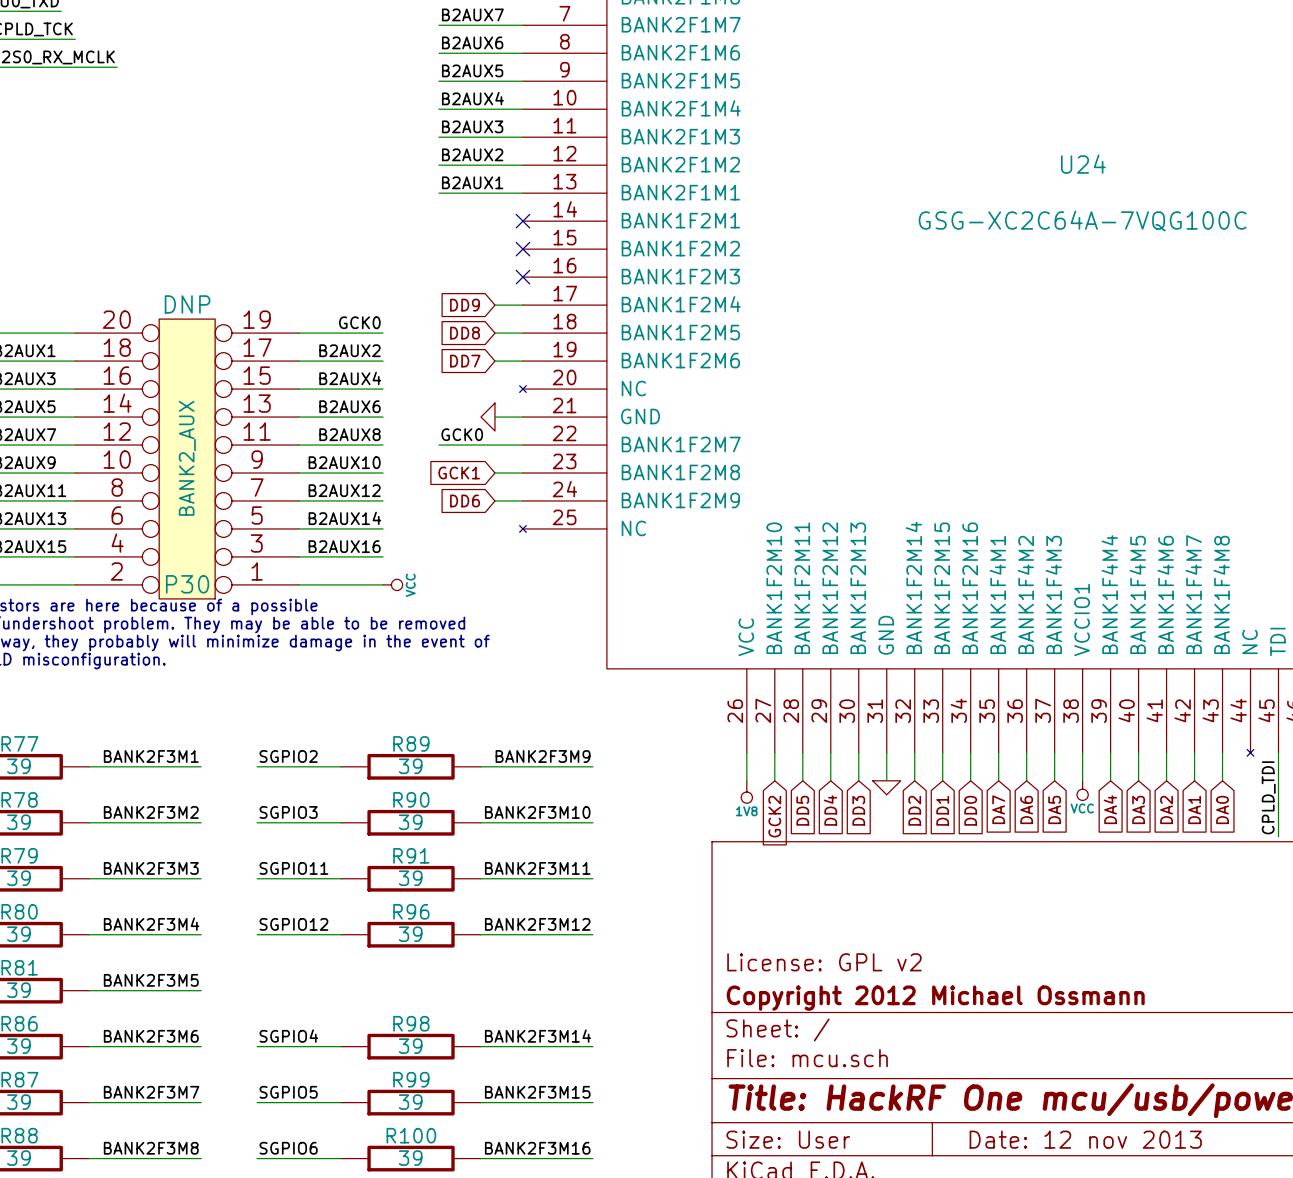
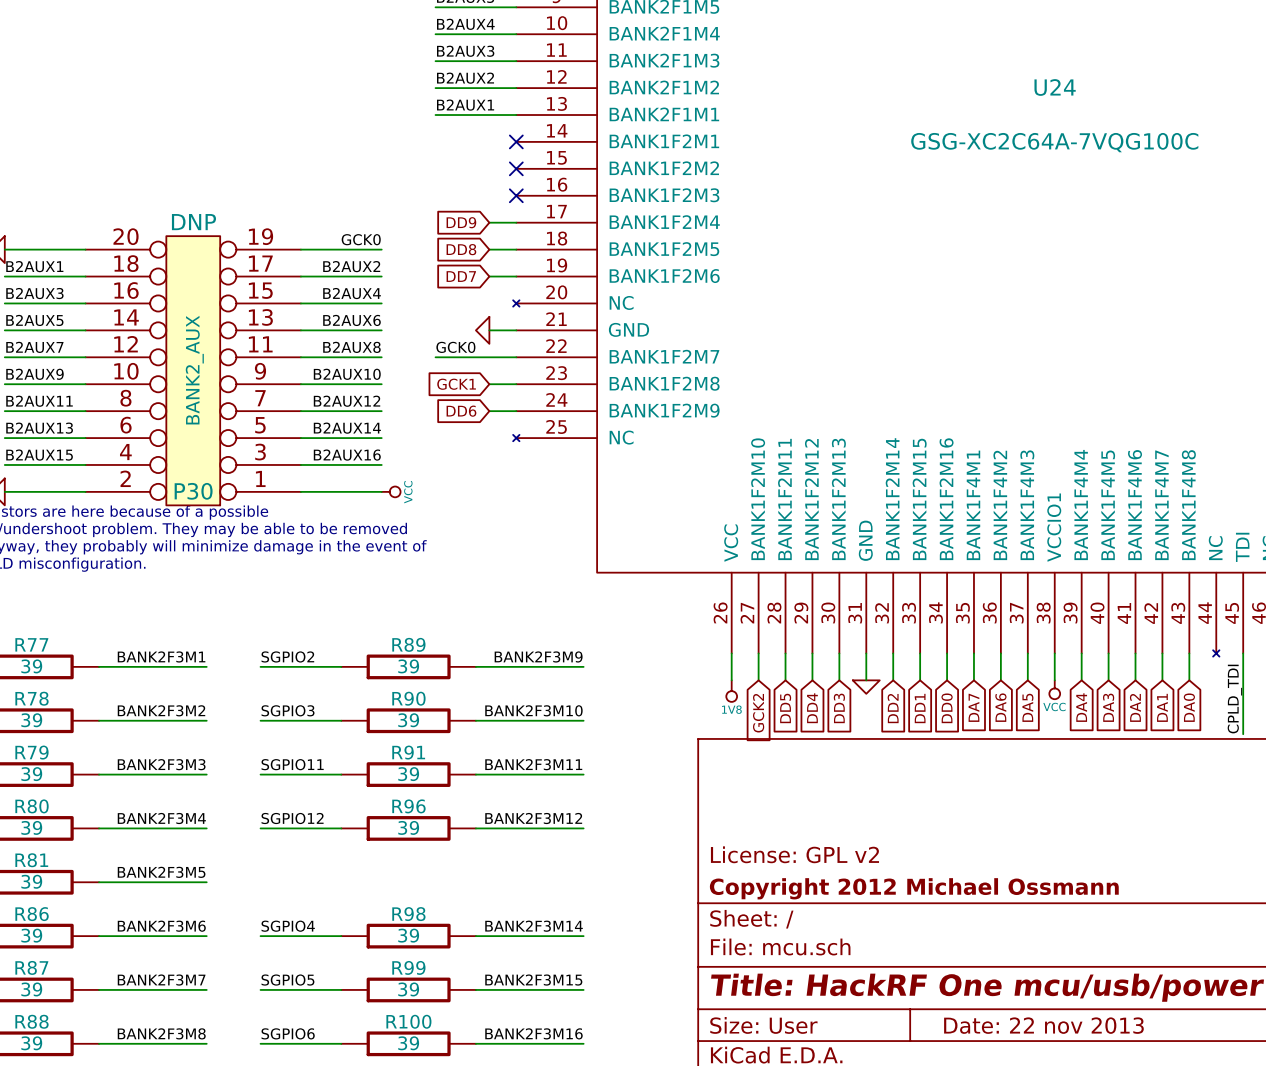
title block: Date: 12 nov 2013 (1085, 1139) -> Date: 22 nov 2013 (1043, 1025)

